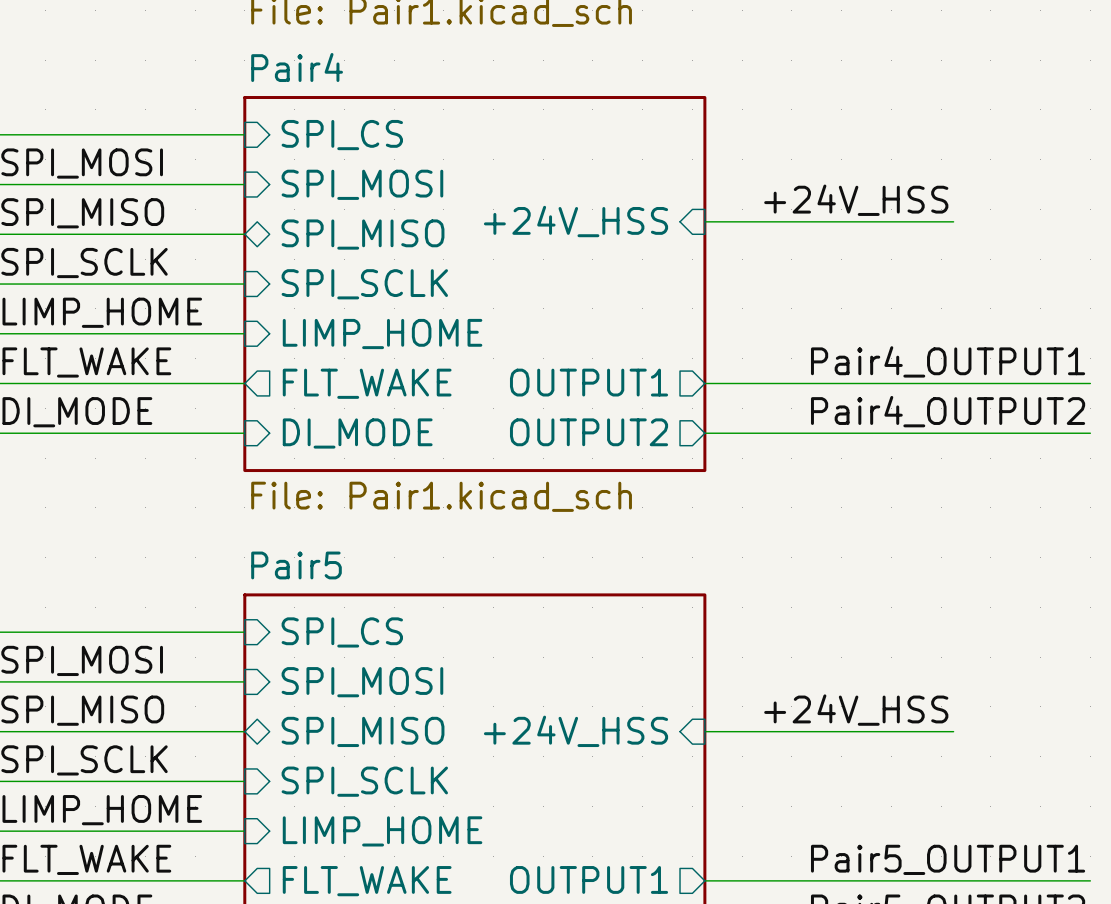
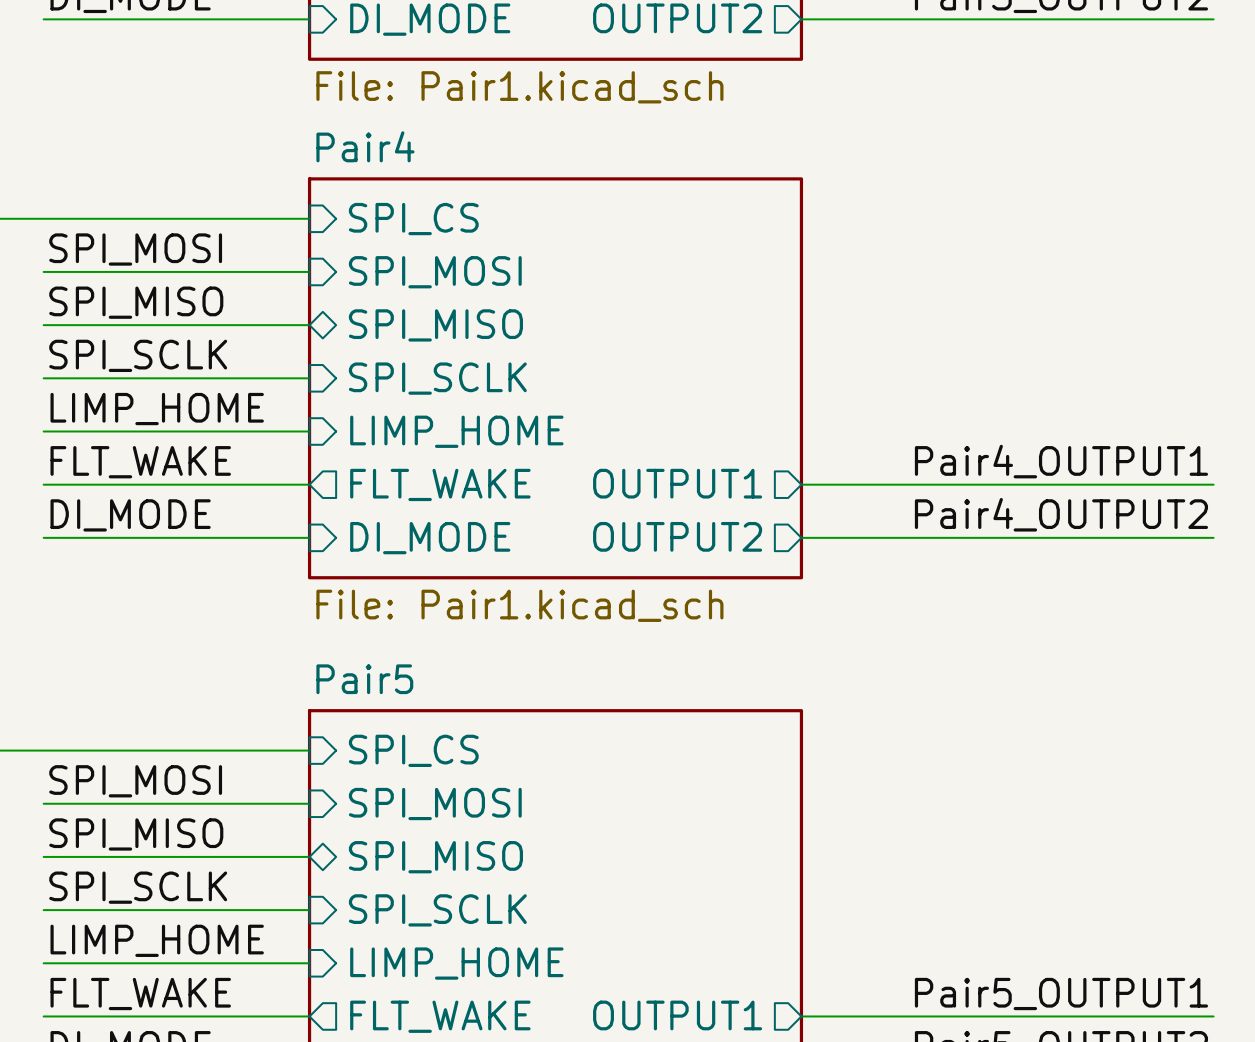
label: +24V_HSS (856, 200) -> none
sheet pin: +24V_HSS (576, 221) -> none
wire: (704, 221) (953, 221) -> none
label: +24V_HSS (856, 710) -> none
sheet pin: +24V_HSS (576, 731) -> none
wire: (704, 731) (953, 731) -> none

